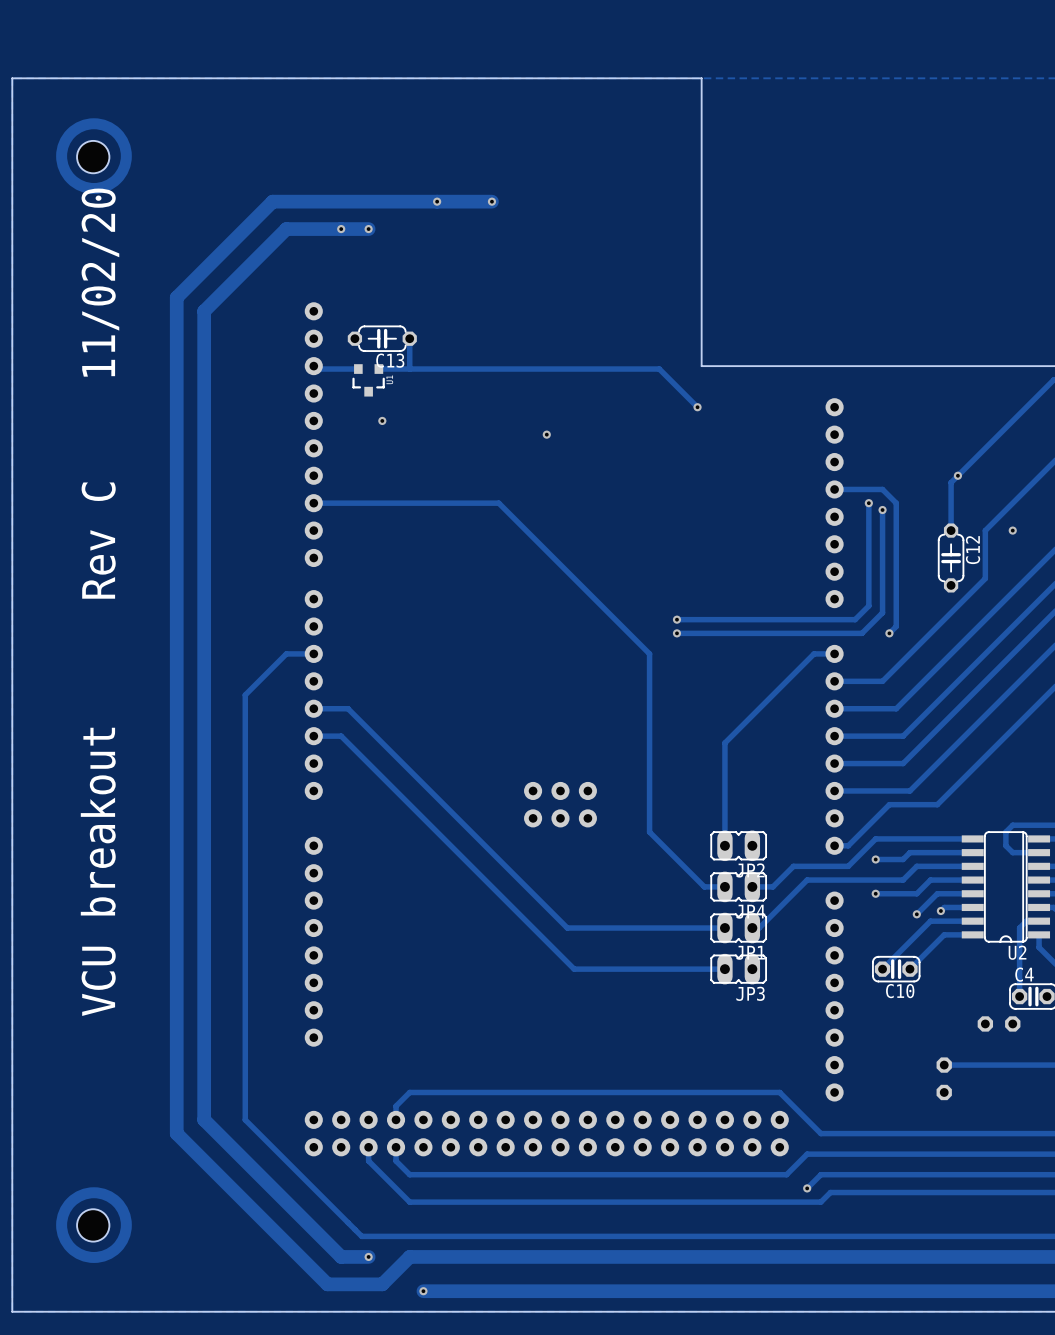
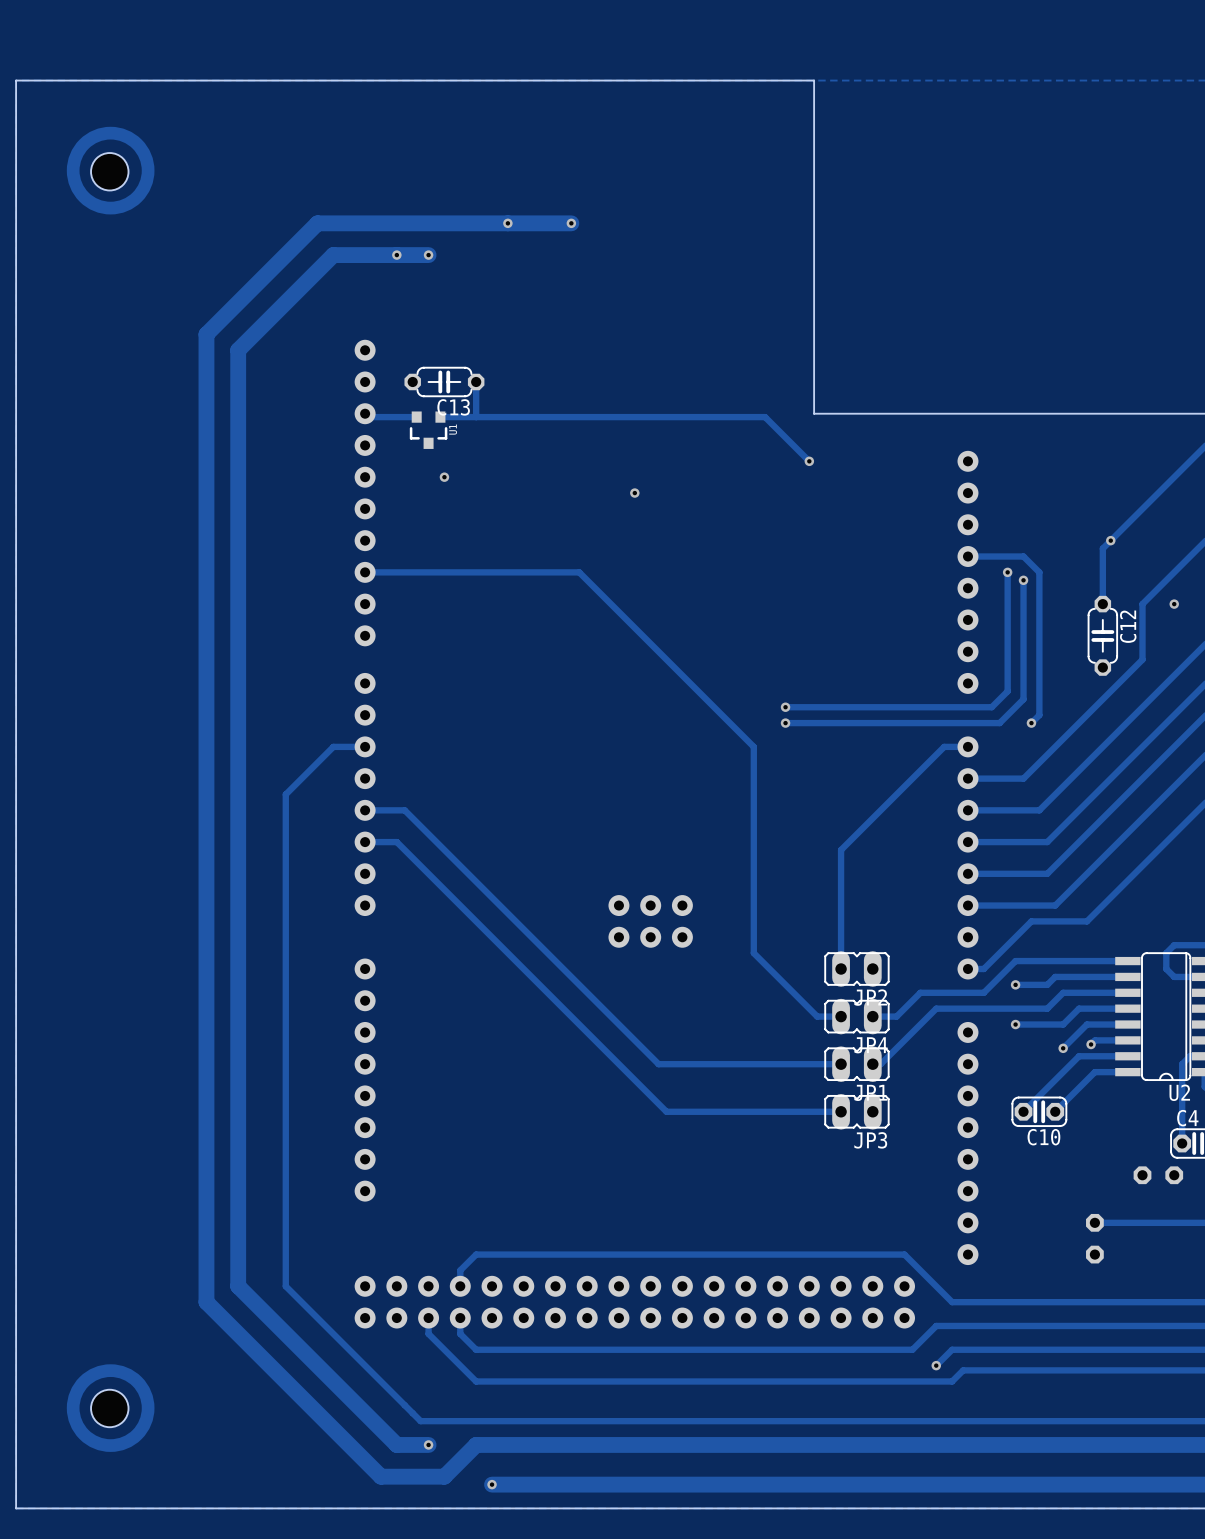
text: VCU breakout Rev C 11/02/20 (100, 602) -> none

